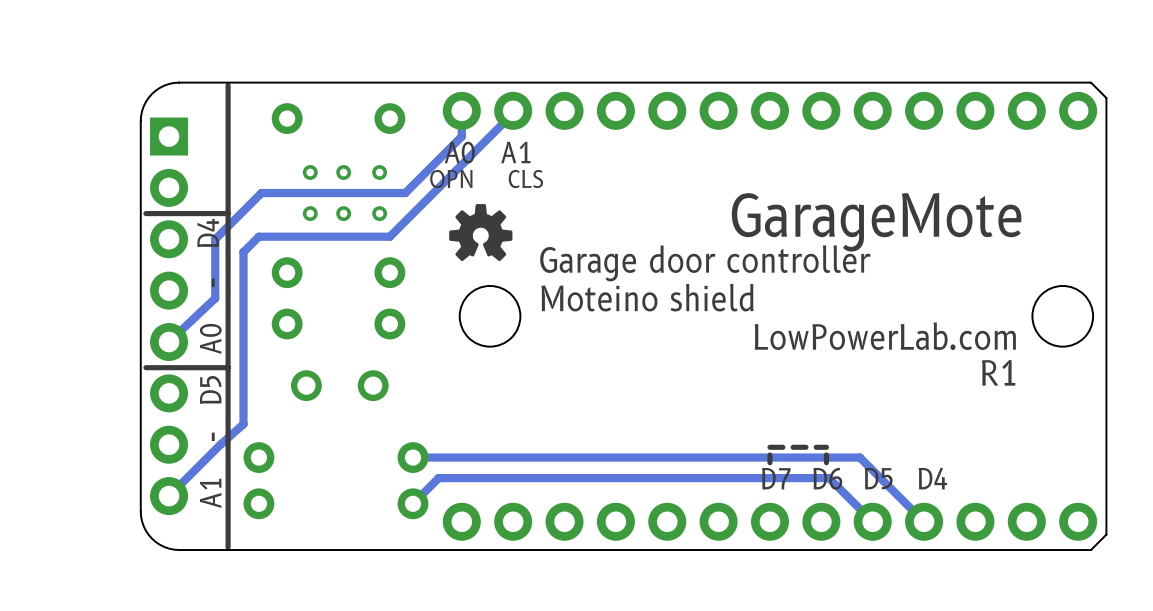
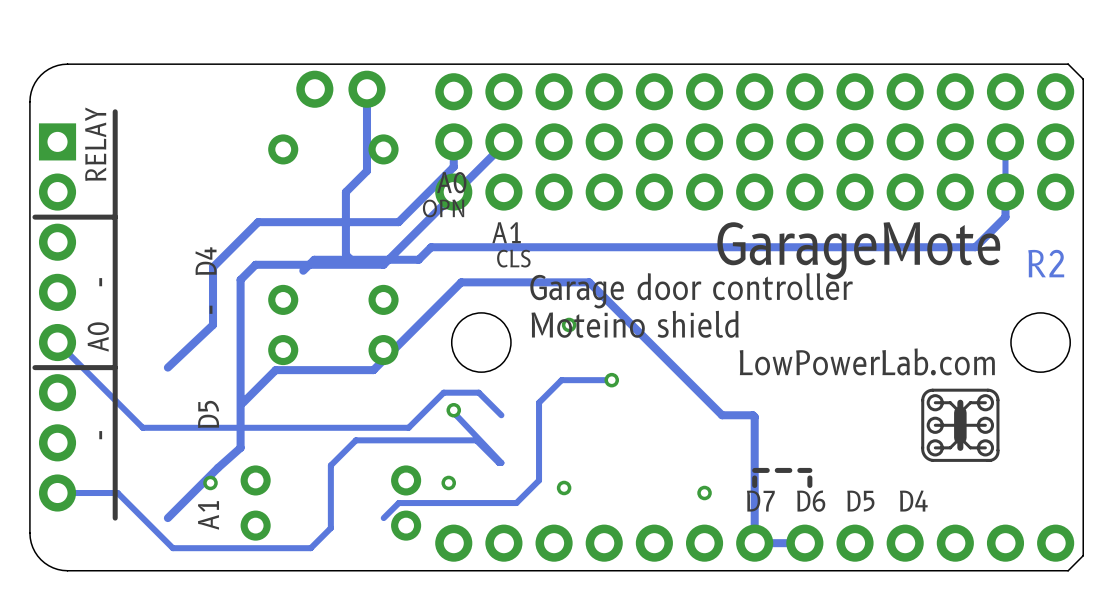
part: none -> (340, 89)
track: none -> (366, 89) (366, 171) (345, 192) (345, 254) (350, 259)
part: none -> (754, 91)
line: none -> (115, 111) (115, 518)
line: (228, 85) (228, 547) -> none
board edge: (1106, 98) (1091, 82) (179, 82) (164, 85) (155, 90) (145, 101) (140, 121) (140, 511) (143, 526) (152, 538) (164, 547) (179, 550) -> (1083, 129) (1083, 79) (1068, 64) (67, 64) (53, 67) (44, 71) (34, 82) (29, 101) (31, 542) (34, 551) (44, 562) (62, 570) (177, 570)
track: none -> (1005, 141) (1005, 217) (975, 247) (431, 247) (418, 259) (314, 259) (303, 270)
text: none -> RELAY (95, 144)
text position: A1 (515, 152) -> A1 (506, 232)
part: none -> (754, 192)
via: (310, 172) -> none
via: (343, 172) -> none
via: (379, 172) -> none
text position: CLS (525, 179) -> CLS (513, 258)
drawing: [449, 204, 513, 262] -> none
line: (228, 213) (145, 213) -> (115, 217) (34, 217)
via: (310, 213) -> none
via: (343, 213) -> none
via: (379, 213) -> none
text: none -> R2 (1046, 263)
text: none -> - (100, 282)
via: none -> (569, 324)
track: none -> (57, 342) (142, 427) (408, 427) (443, 392) (478, 392) (501, 415)
part position: (169, 316) -> (57, 317)
text position: A0 (210, 338) -> A0 (98, 336)
track: none -> (611, 380) (561, 380) (539, 402) (539, 480) (516, 503) (398, 503) (383, 518)
via: none -> (611, 380)
drawing: none -> [921, 388, 1000, 462]
line: (228, 367) (145, 367) -> (115, 367) (34, 367)
text: R1 (998, 372) -> none
track: none -> (243, 402) (275, 370) (373, 370) (461, 282) (589, 282) (722, 415) (752, 415) (754, 417) (754, 543) (804, 543)
part: (339, 385) -> none
track: none -> (453, 410) (456, 415) (501, 462) (498, 462) (476, 440) (355, 440) (330, 465) (330, 528) (310, 548) (172, 548) (117, 493) (57, 493)
via: none -> (453, 410)
text: none -> - (100, 435)
text: - (213, 436) -> none
track: (413, 457) (859, 457) (924, 521) -> none
via: none -> (210, 482)
via: none -> (448, 482)
via: none -> (564, 487)
via: none -> (704, 493)
track: (413, 503) (438, 478) (829, 478) (872, 521) -> none

